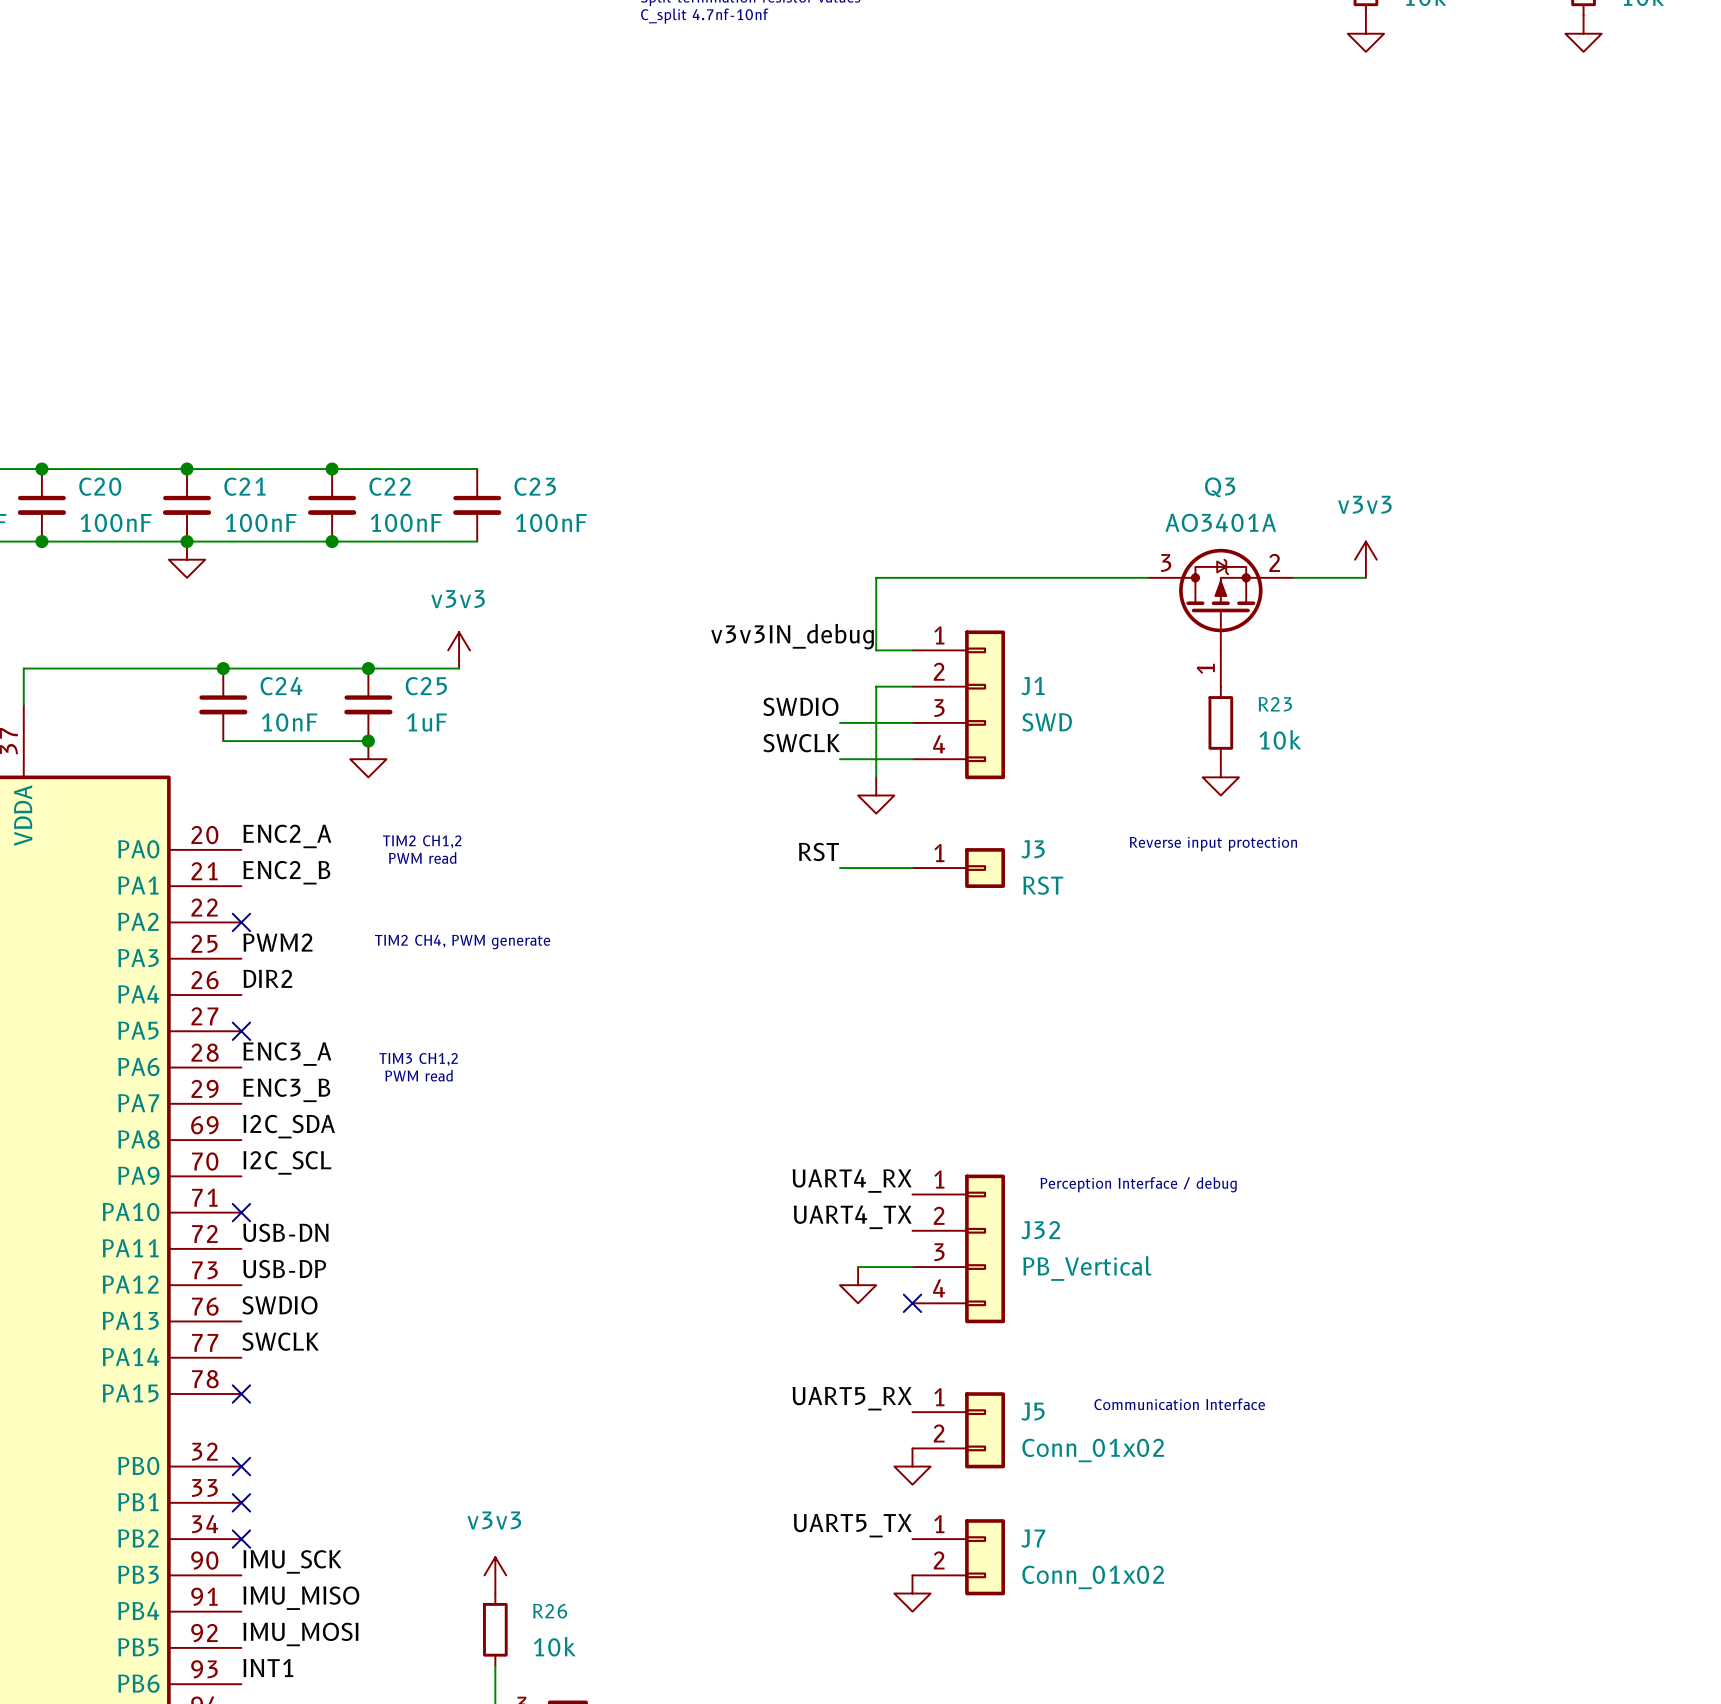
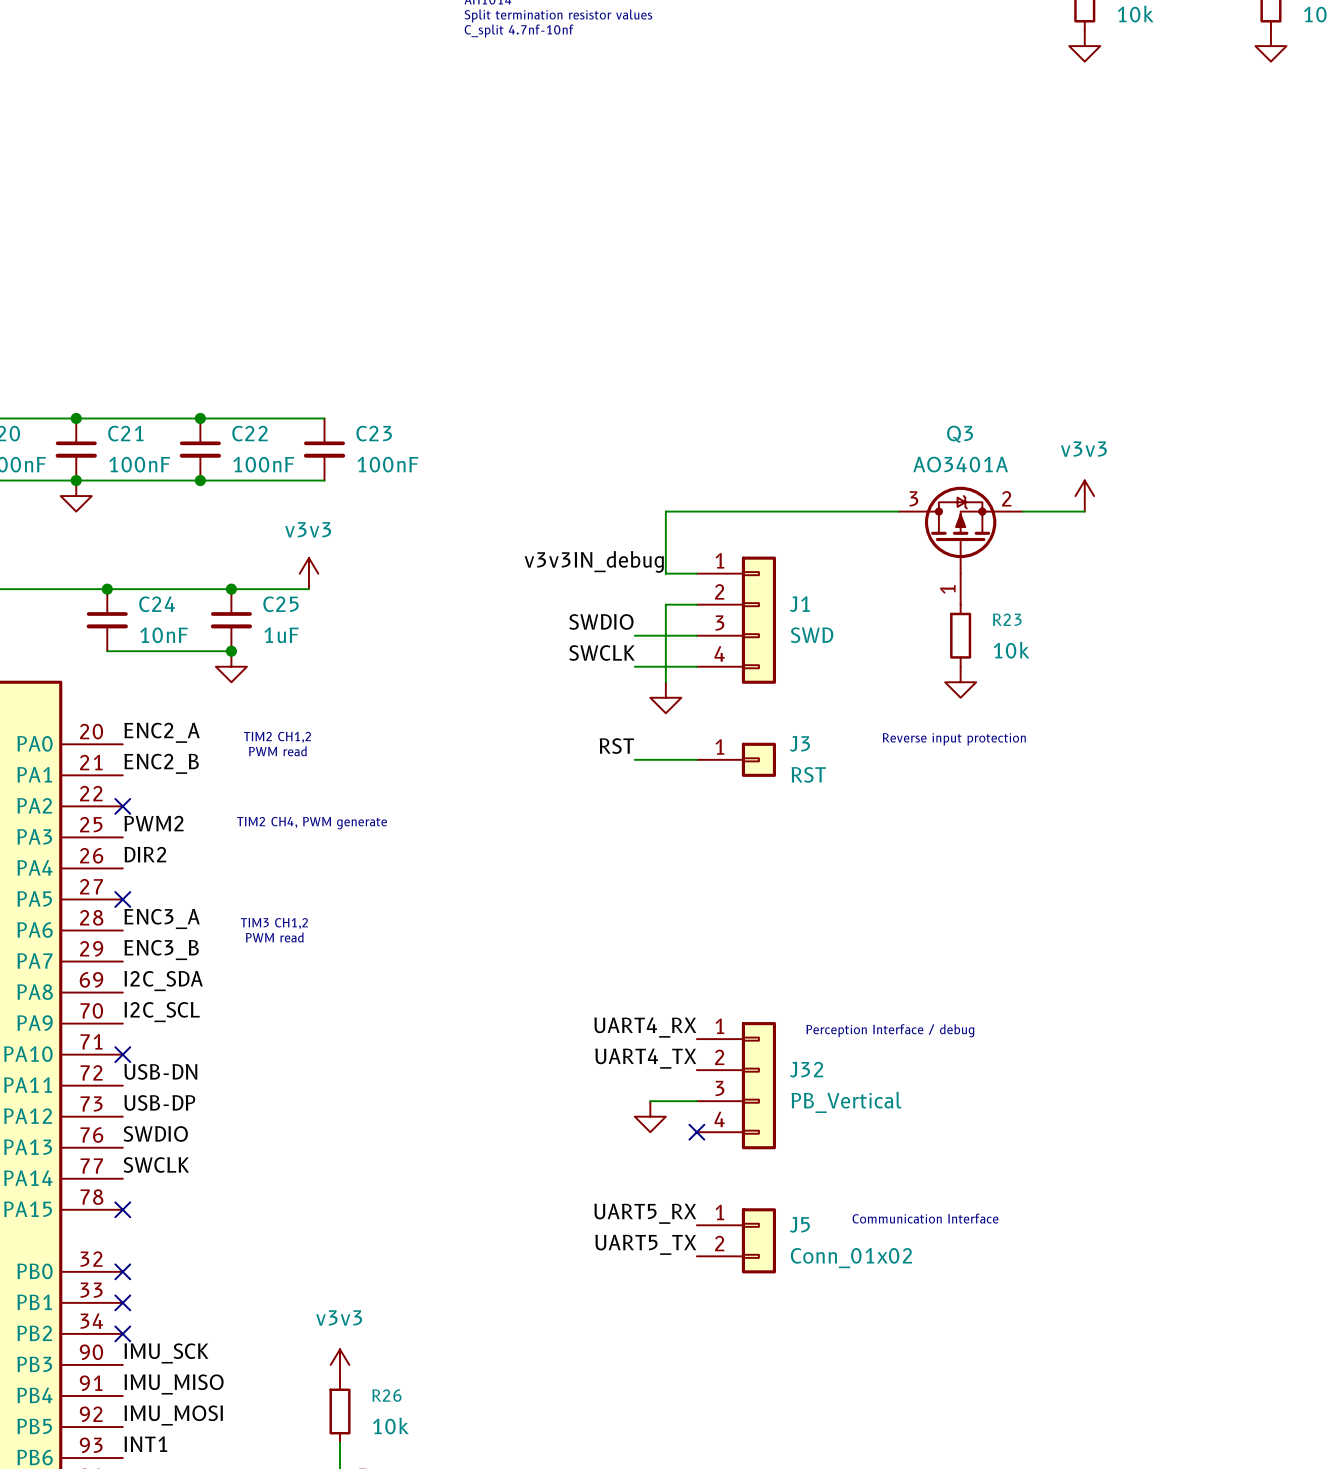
power symbol: (912, 1466) -> none
label position: UART5_TX (852, 1525) -> UART5_TX (645, 1244)
J7: Conn_01x02 (958, 1557) -> none
power symbol: (912, 1593) -> none

